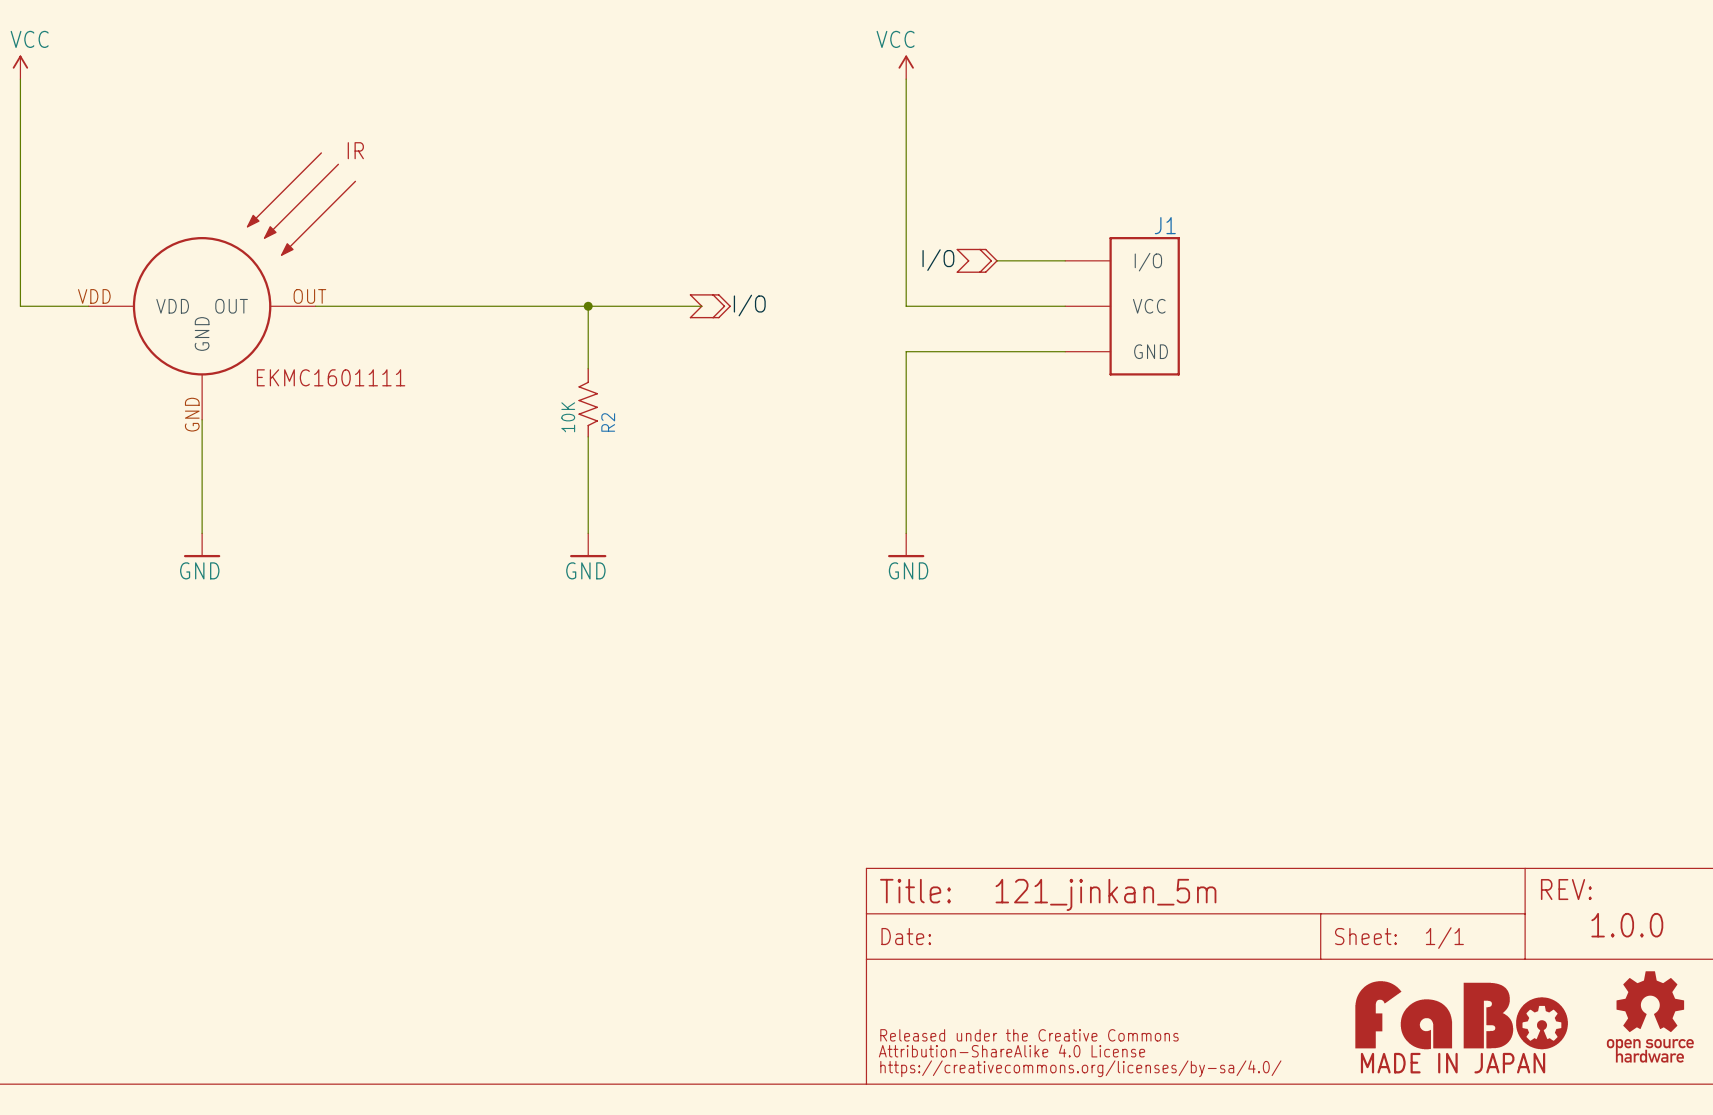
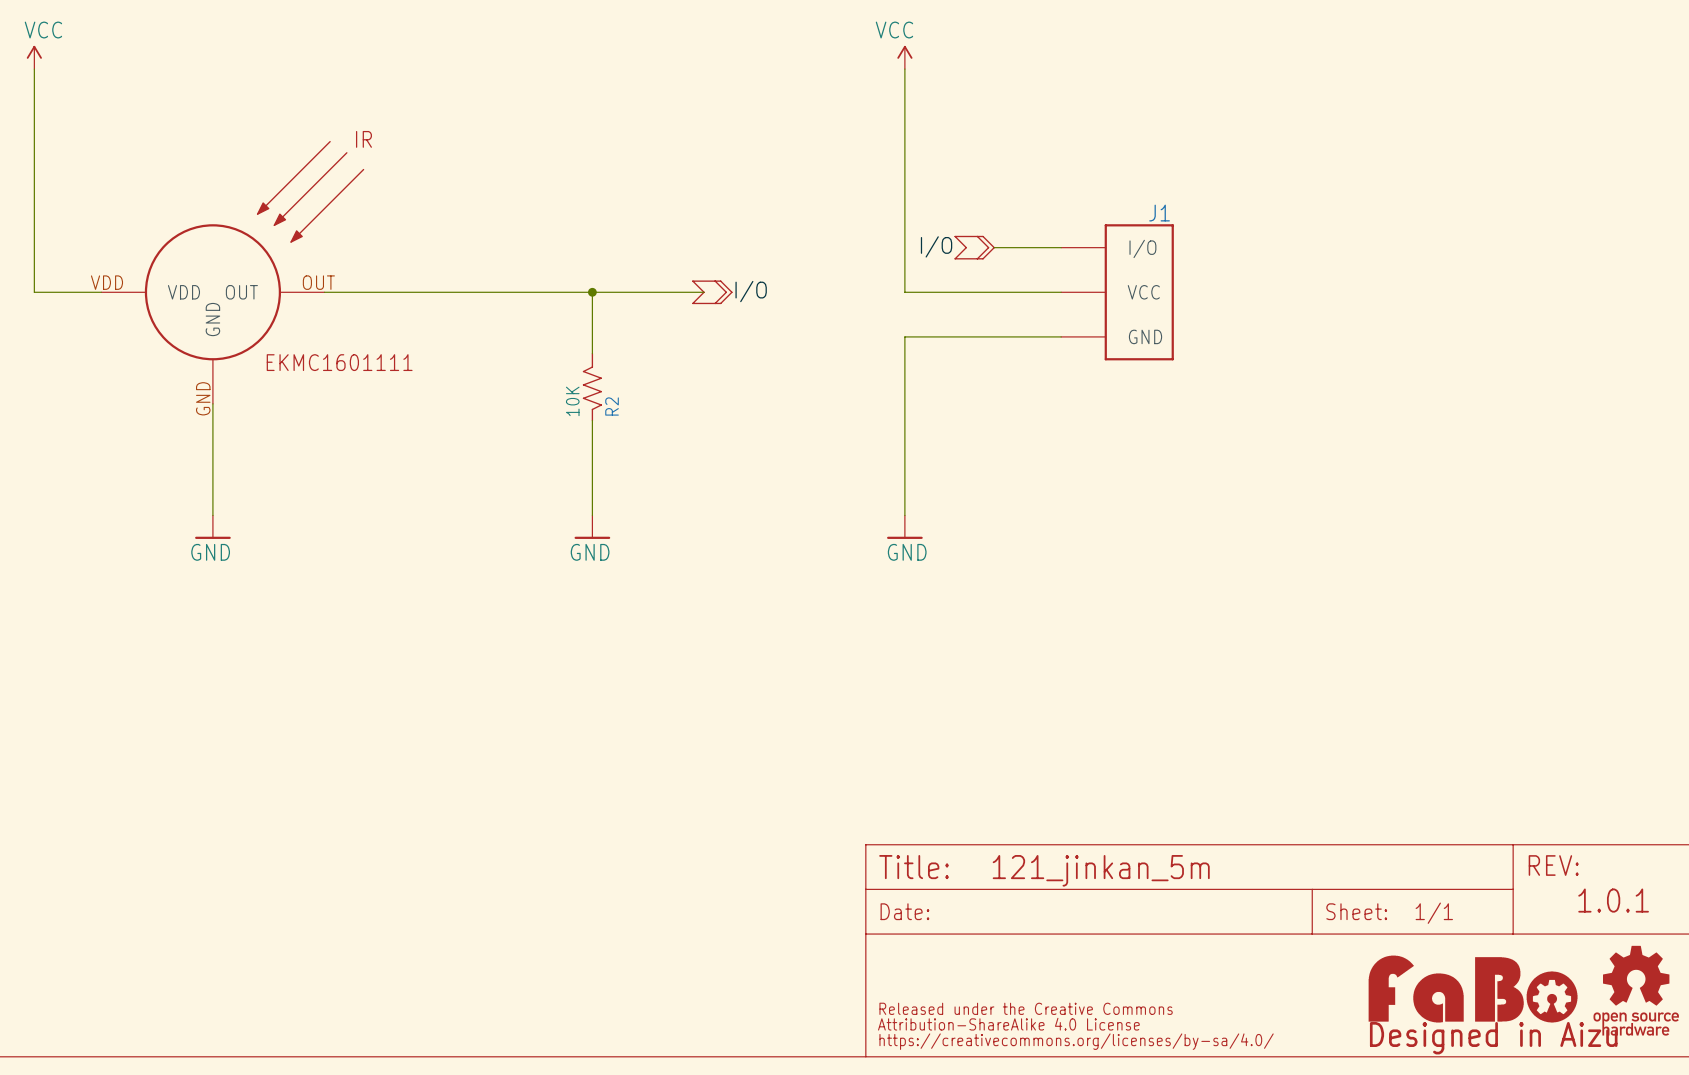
text: 1.0.0 (1627, 925) -> 1.0.1 (1613, 900)
part: (1461, 1015) -> none
part: none -> (1473, 989)

